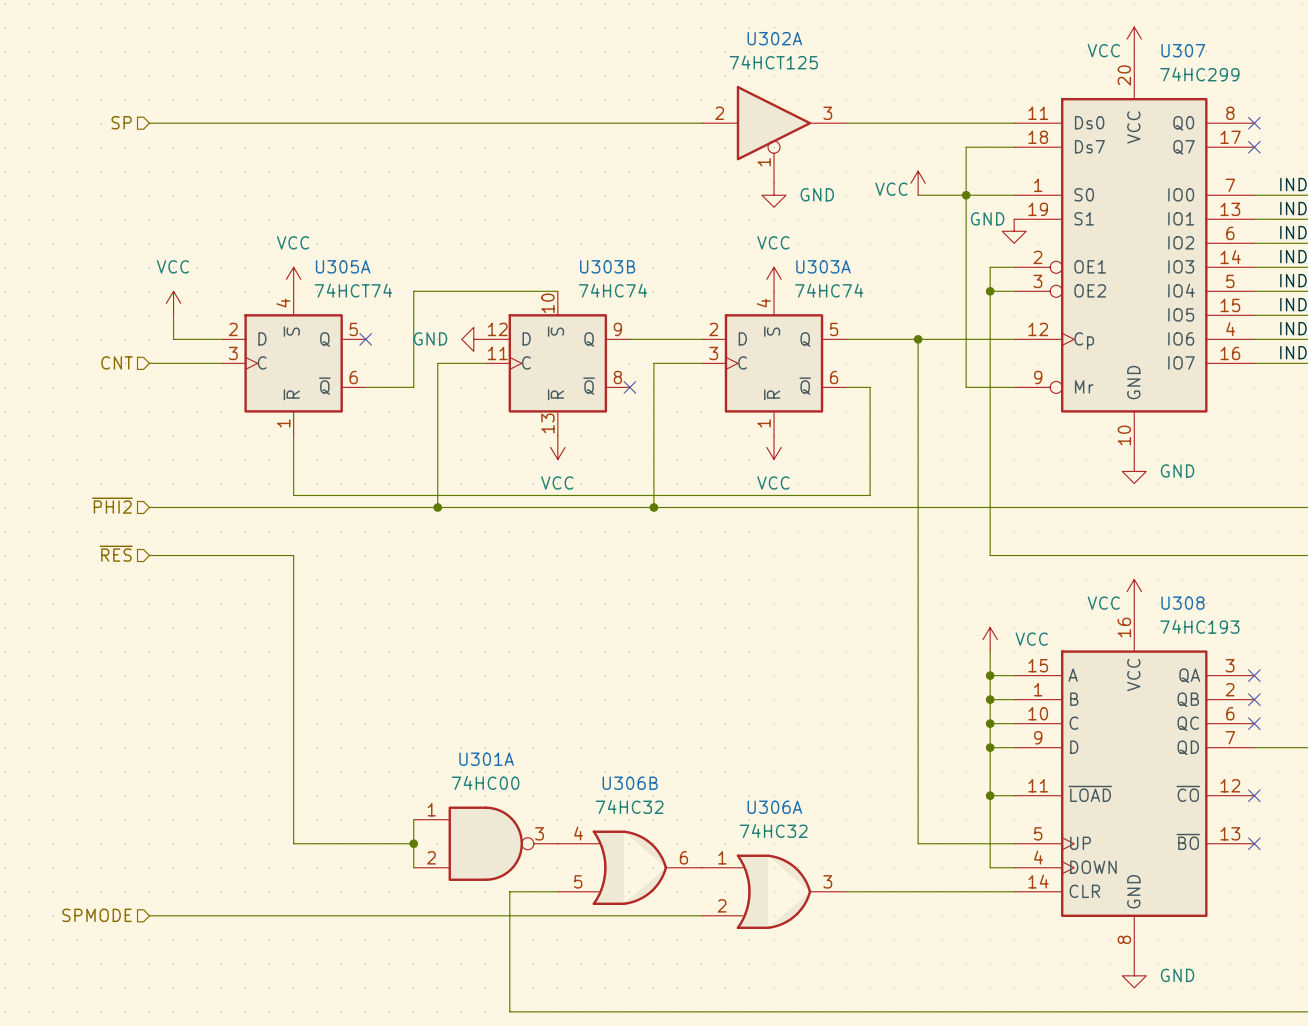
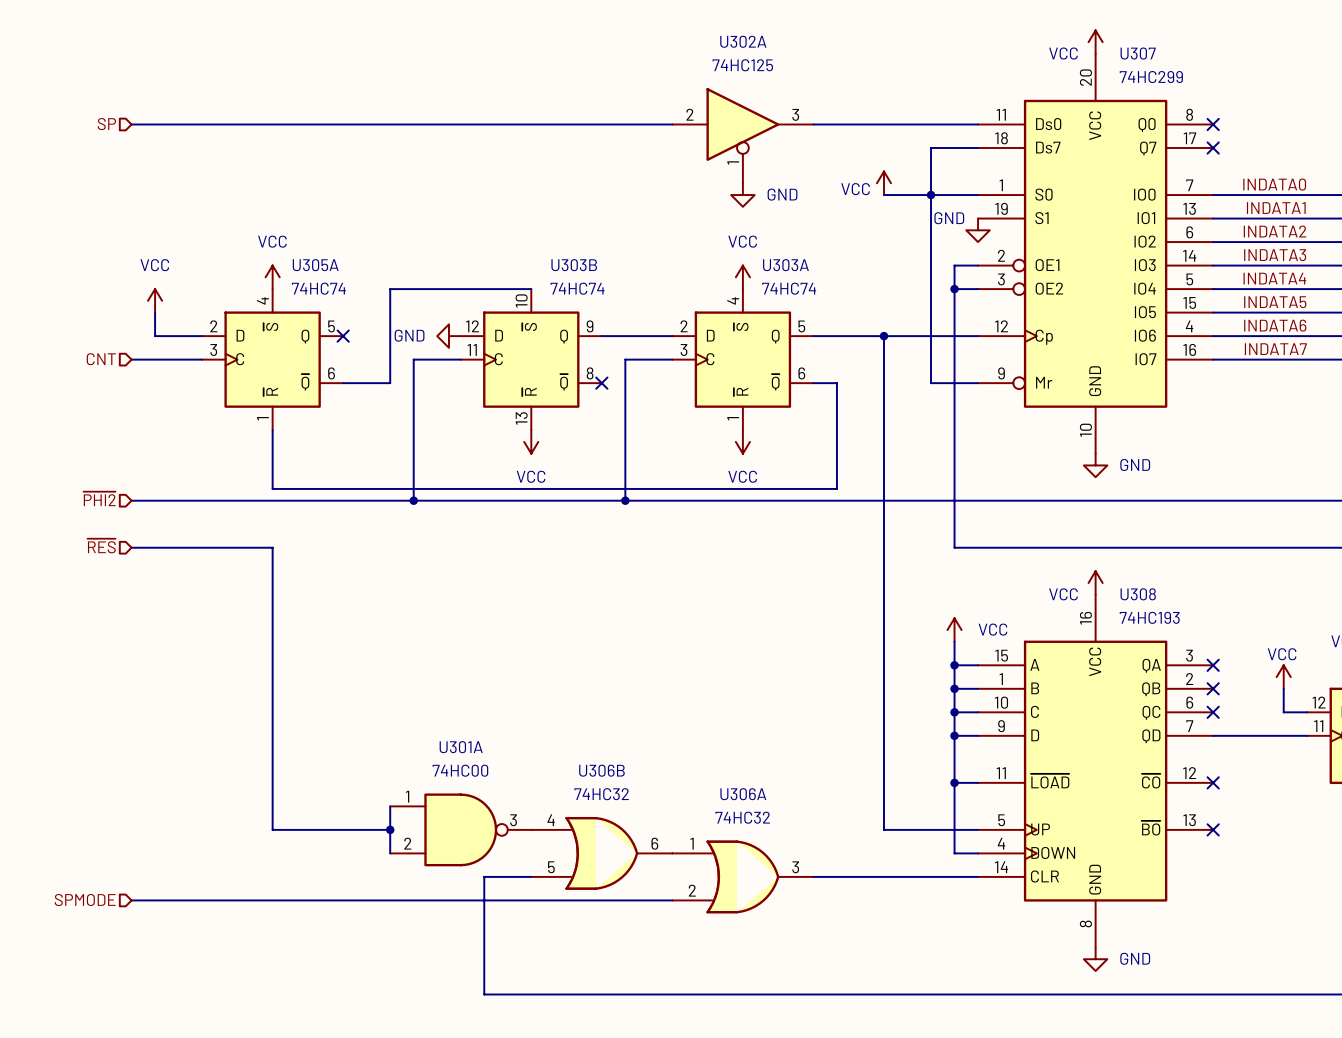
U302A value: 74HCT125 (773, 62) -> 74HC125 (742, 65)
U305A value: 74HCT74 (353, 290) -> 74HC74 (318, 288)

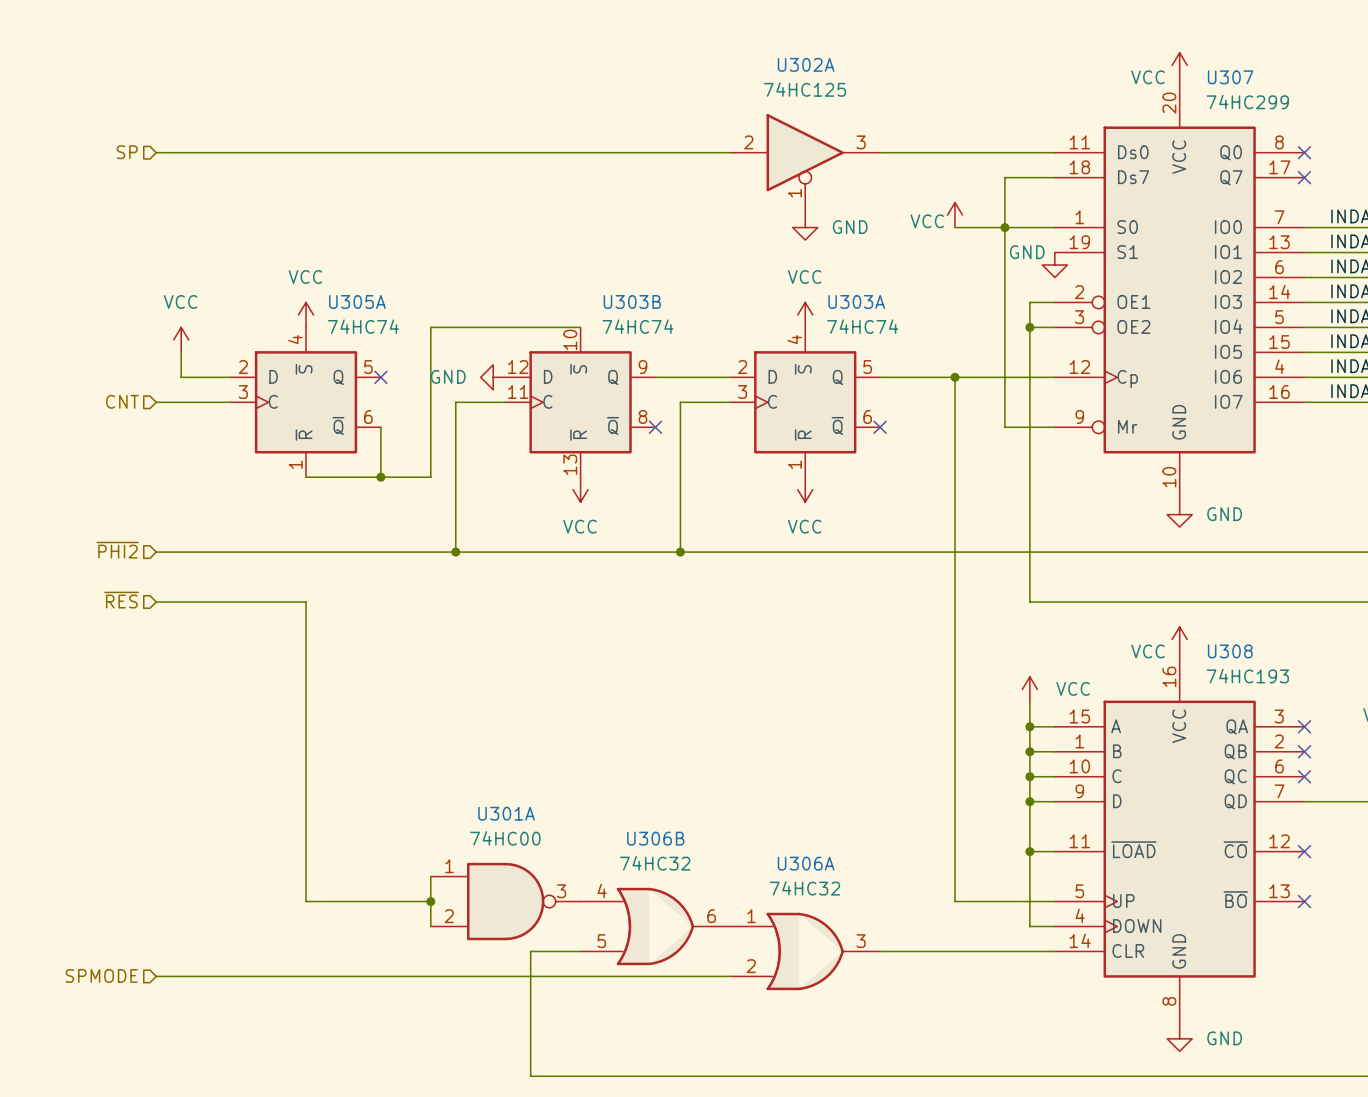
wire: (343, 383) (390, 383) -> (380, 427) (380, 477)
wire: (813, 383) (836, 383) (836, 488) (272, 488) (272, 430) -> (430, 427) (430, 477) (306, 477)
no-connect mark: none -> (880, 427)
junction: none -> (380, 477)

